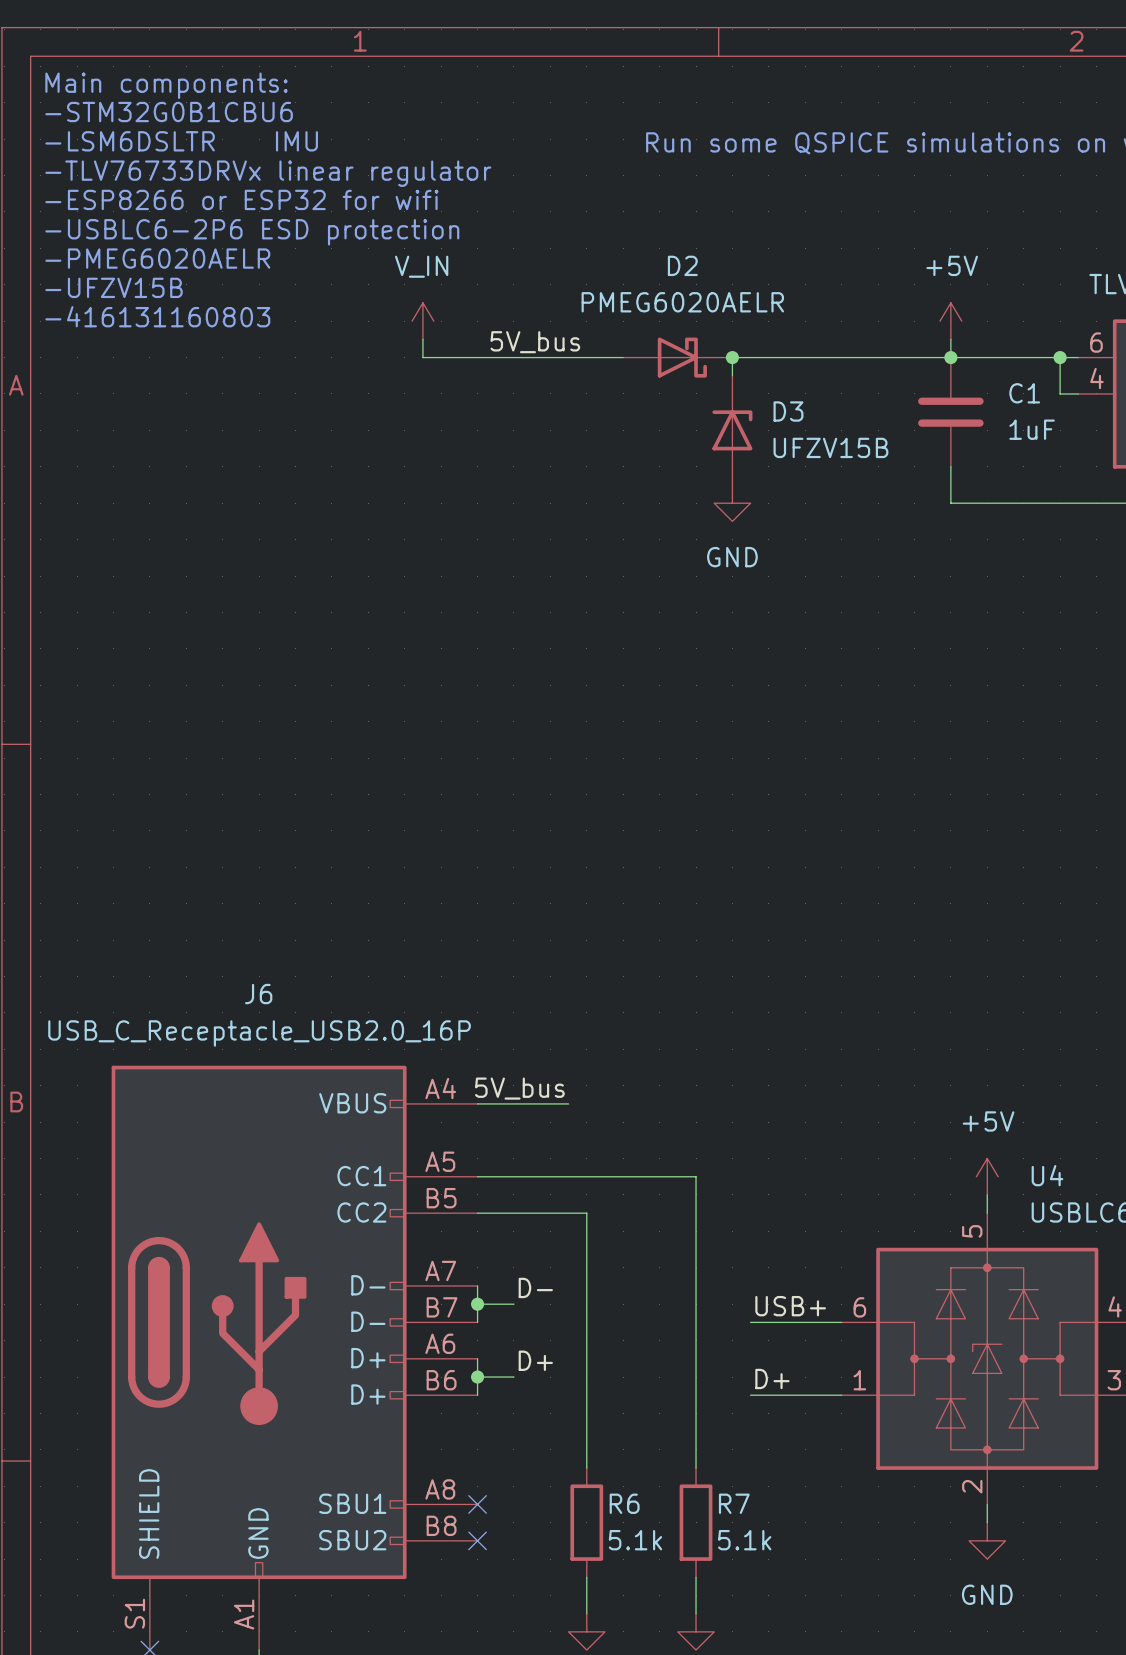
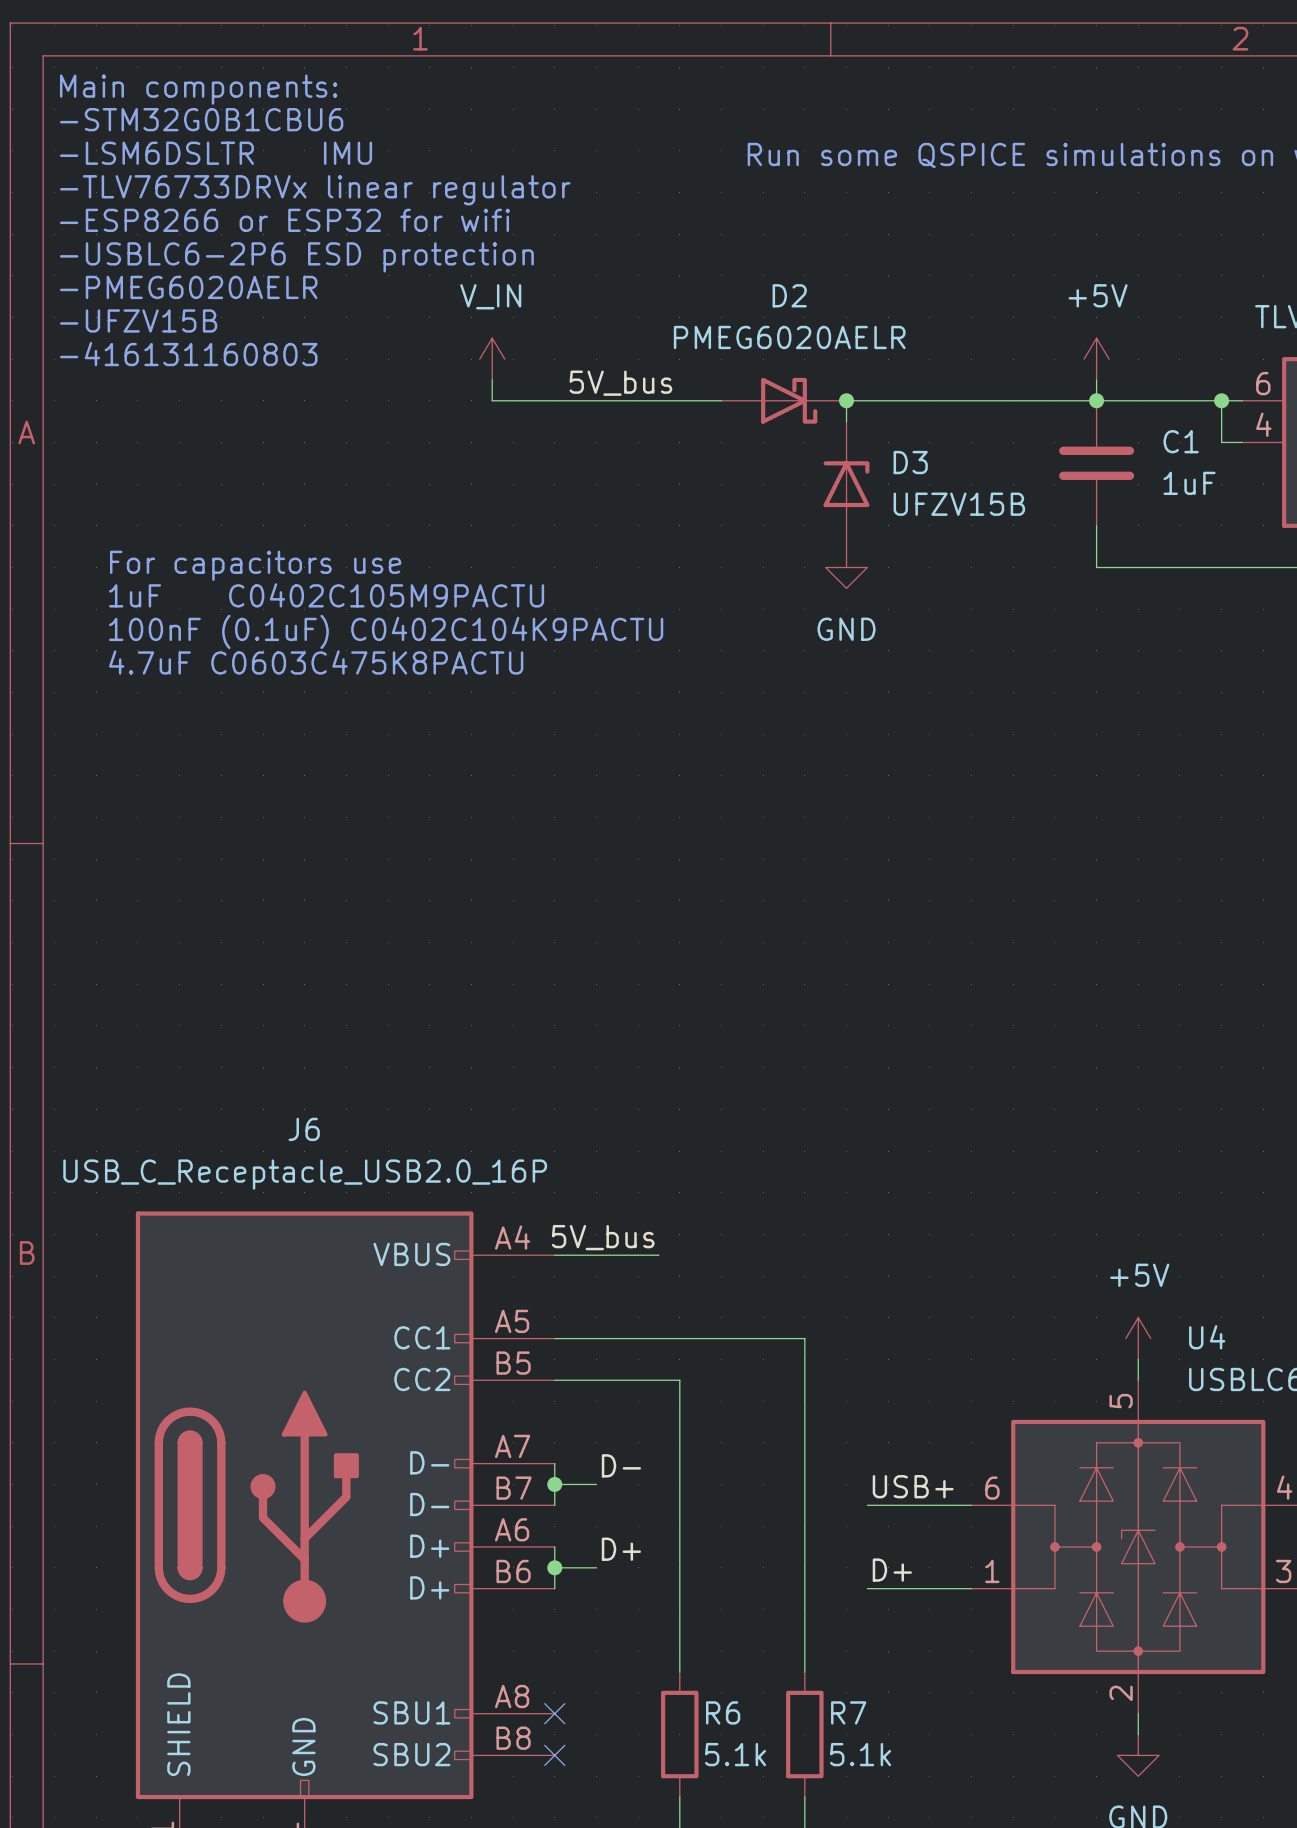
text: none -> For capacitors use (255, 565)
text: none -> 1uF C0402C105M9PACTU (326, 595)
text: none -> 100nF (0.1uF) C0402C104K9PACTU (386, 631)
text: none -> 4.7uF C0603C475K8PACTU (316, 662)

